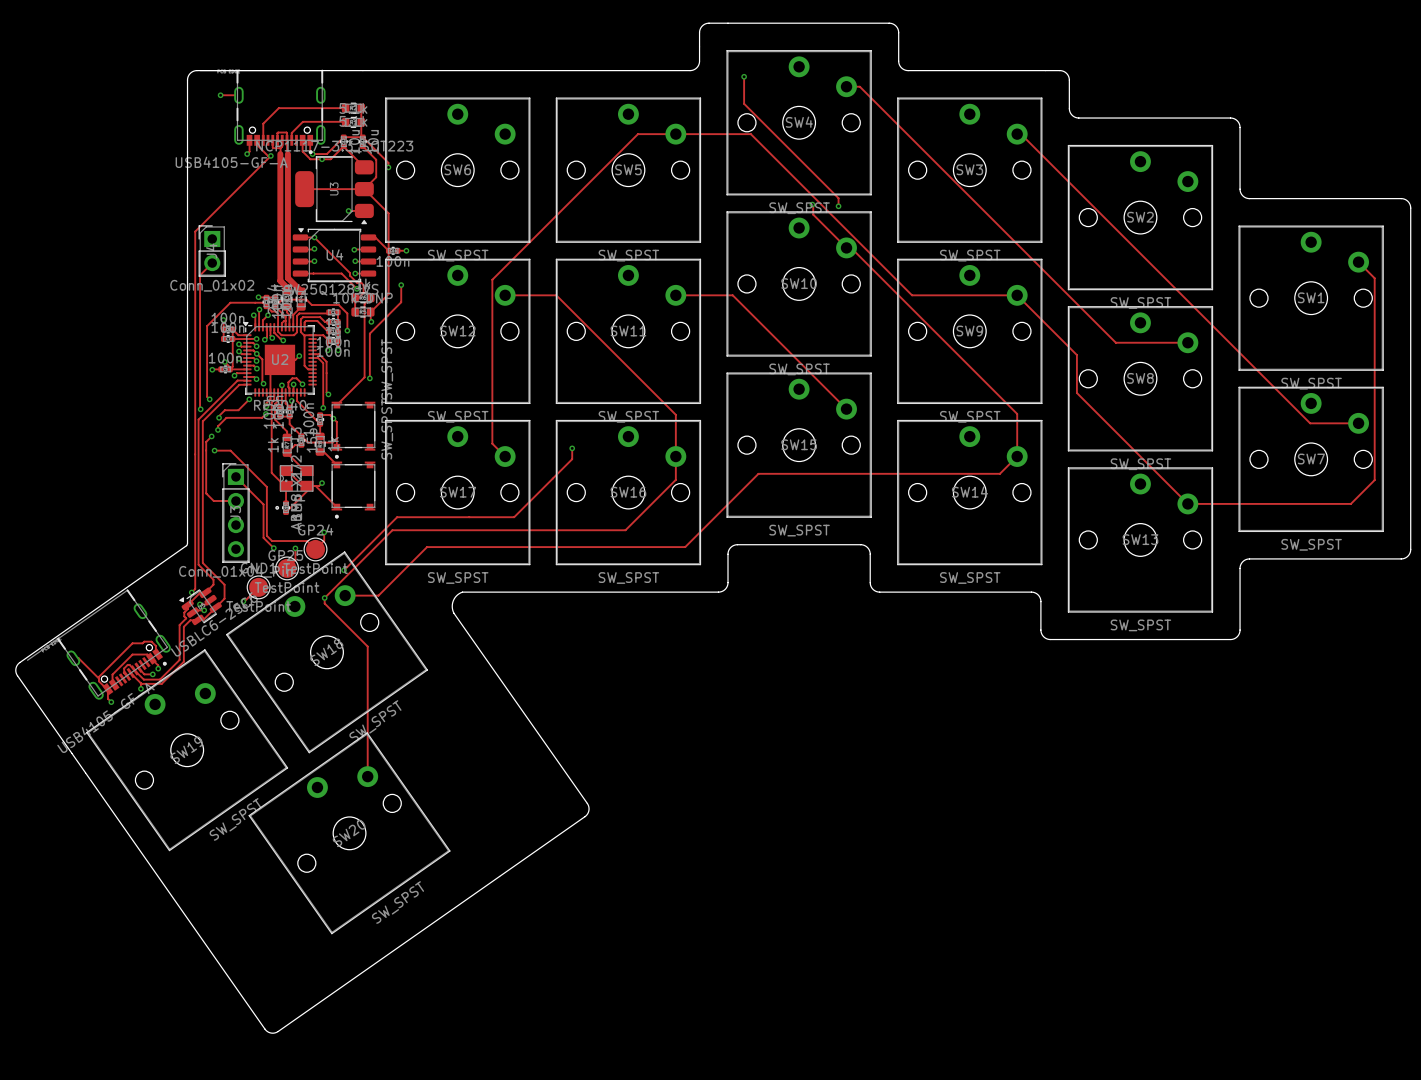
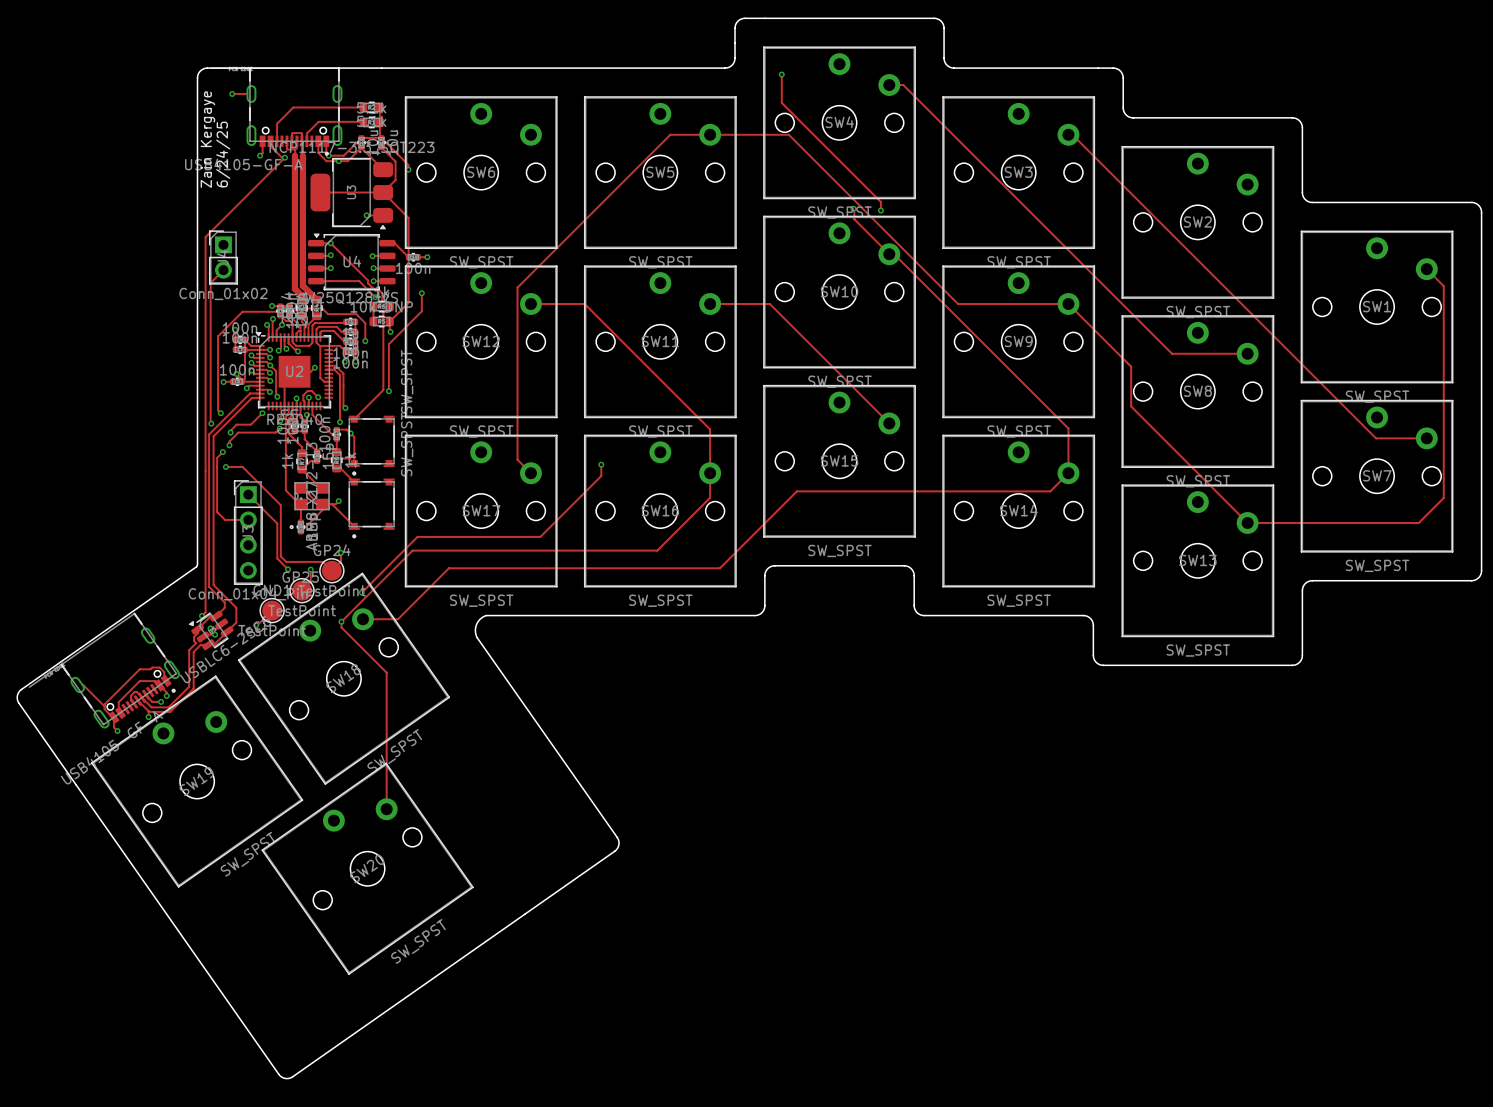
text: none -> Zain Kergaye (207, 139)
text: none -> 6/24/25 (223, 154)

